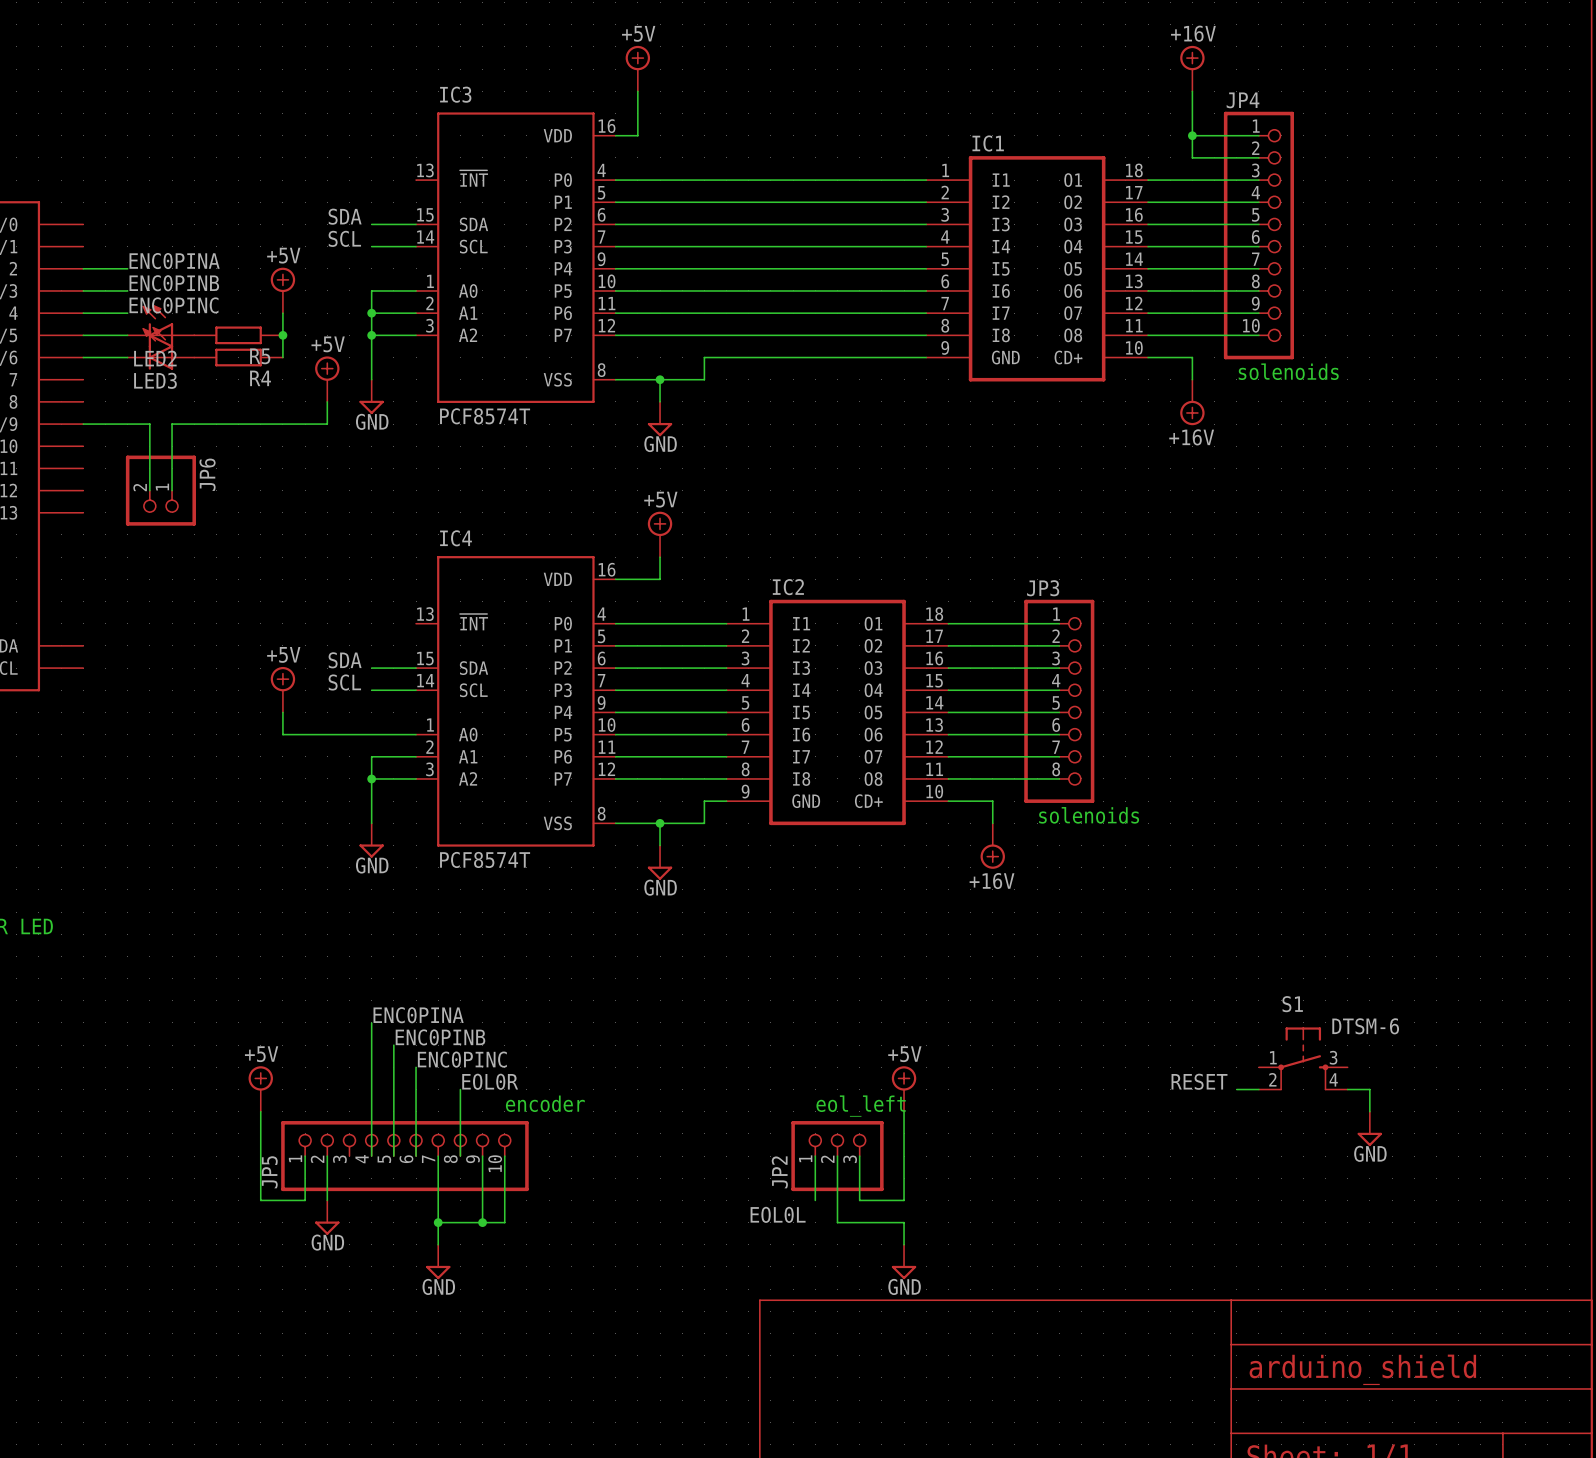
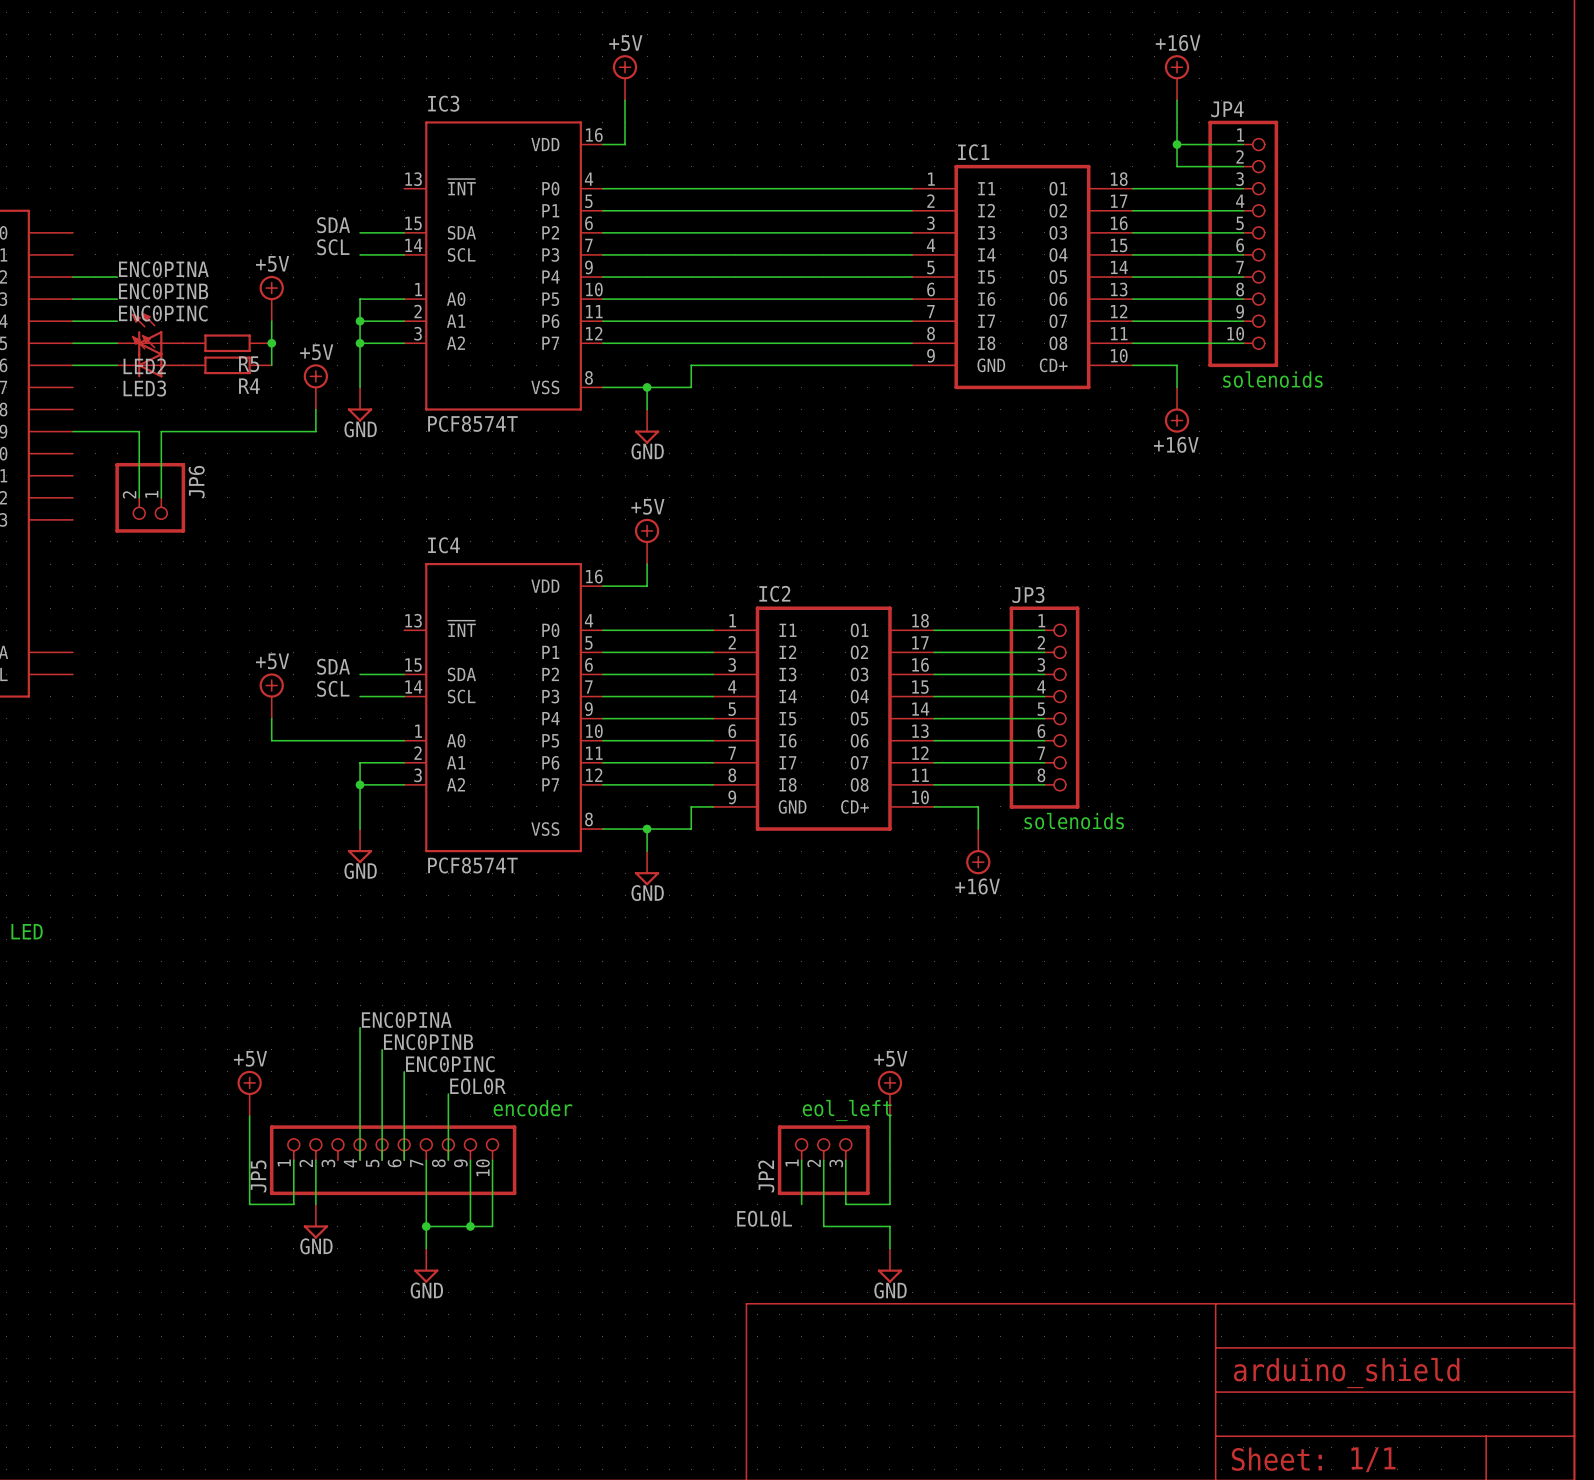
S1: DTSM-6 (1303, 1058) -> none
label: RESET (1199, 1081) -> none
wire: (1236, 1089) (1258, 1089) -> none
wire: (1347, 1089) (1369, 1089) (1369, 1111) -> none
power symbol: GND (1369, 1128) -> none

